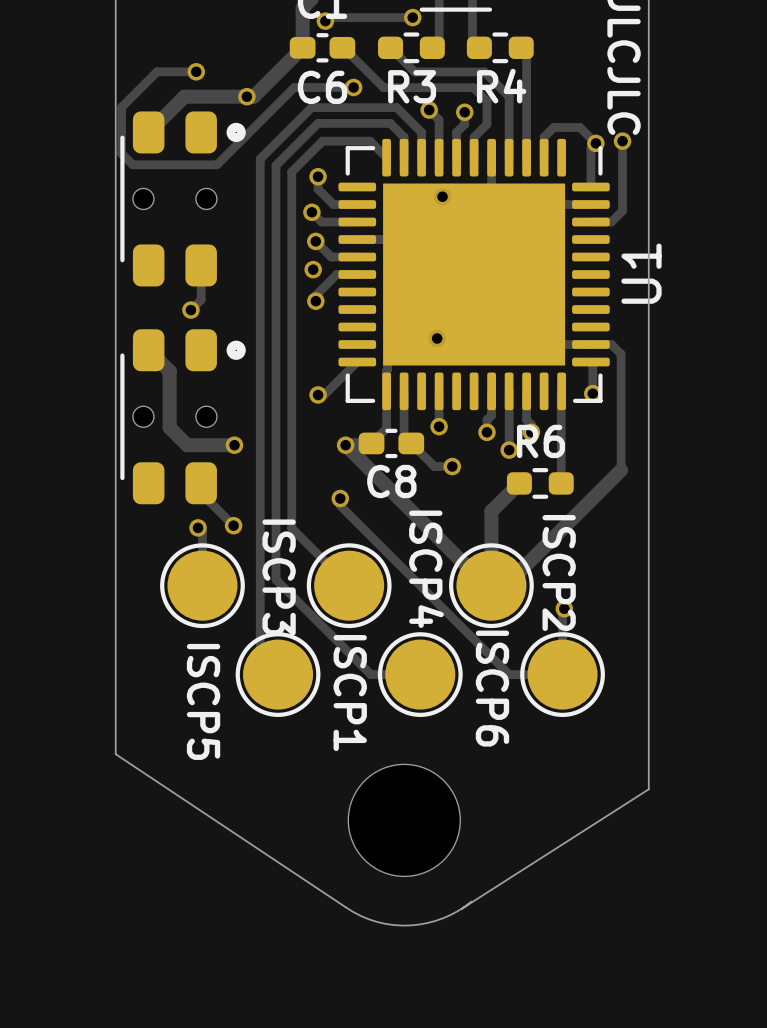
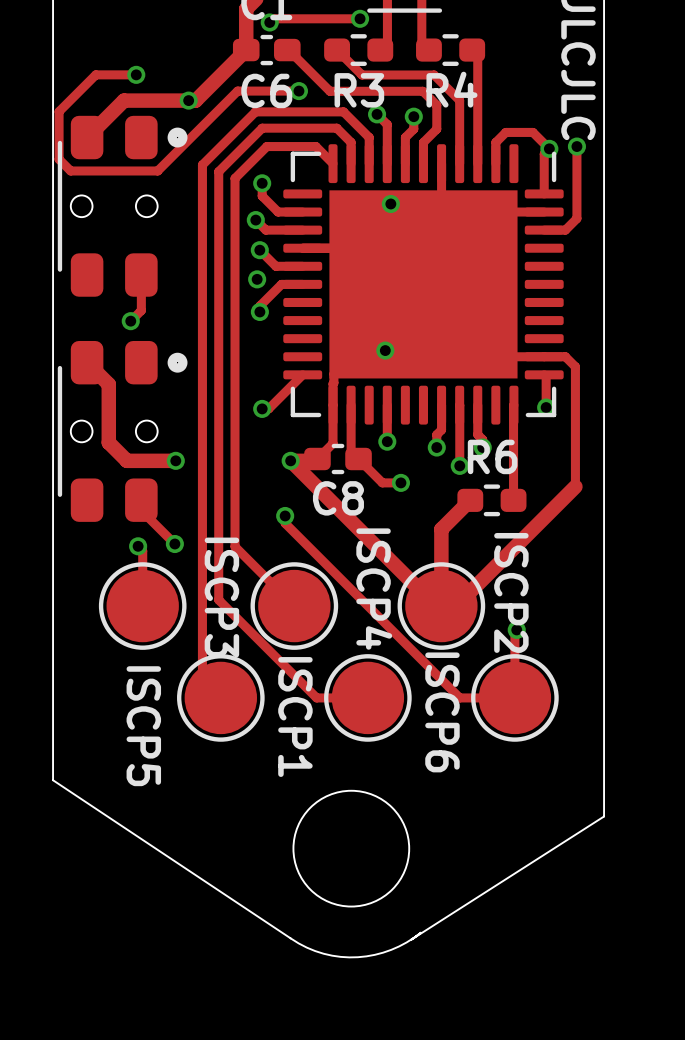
U1 name: U1 (641, 273) -> none

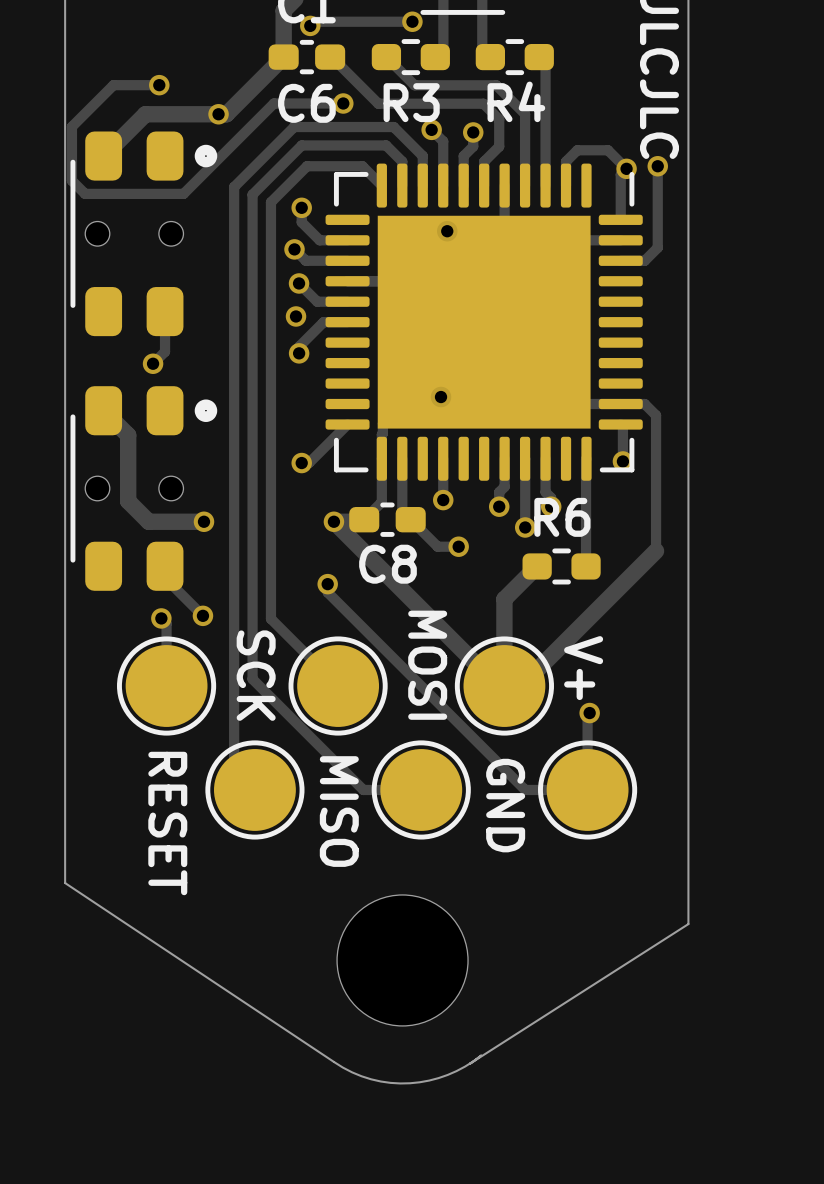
ISCP4 name: ISCP4 (374, 589) -> MOSI (427, 665)
ISCP2 name: ISCP2 (511, 592) -> V+ (583, 668)
ISCP3 name: ISCP3 (221, 597) -> SCK (256, 675)
ISCP6 name: ISCP6 (442, 712) -> GND (505, 805)
ISCP1 name: ISCP1 (295, 717) -> MISO (339, 811)
ISCP5 name: ISCP5 (143, 726) -> RESET (167, 823)

